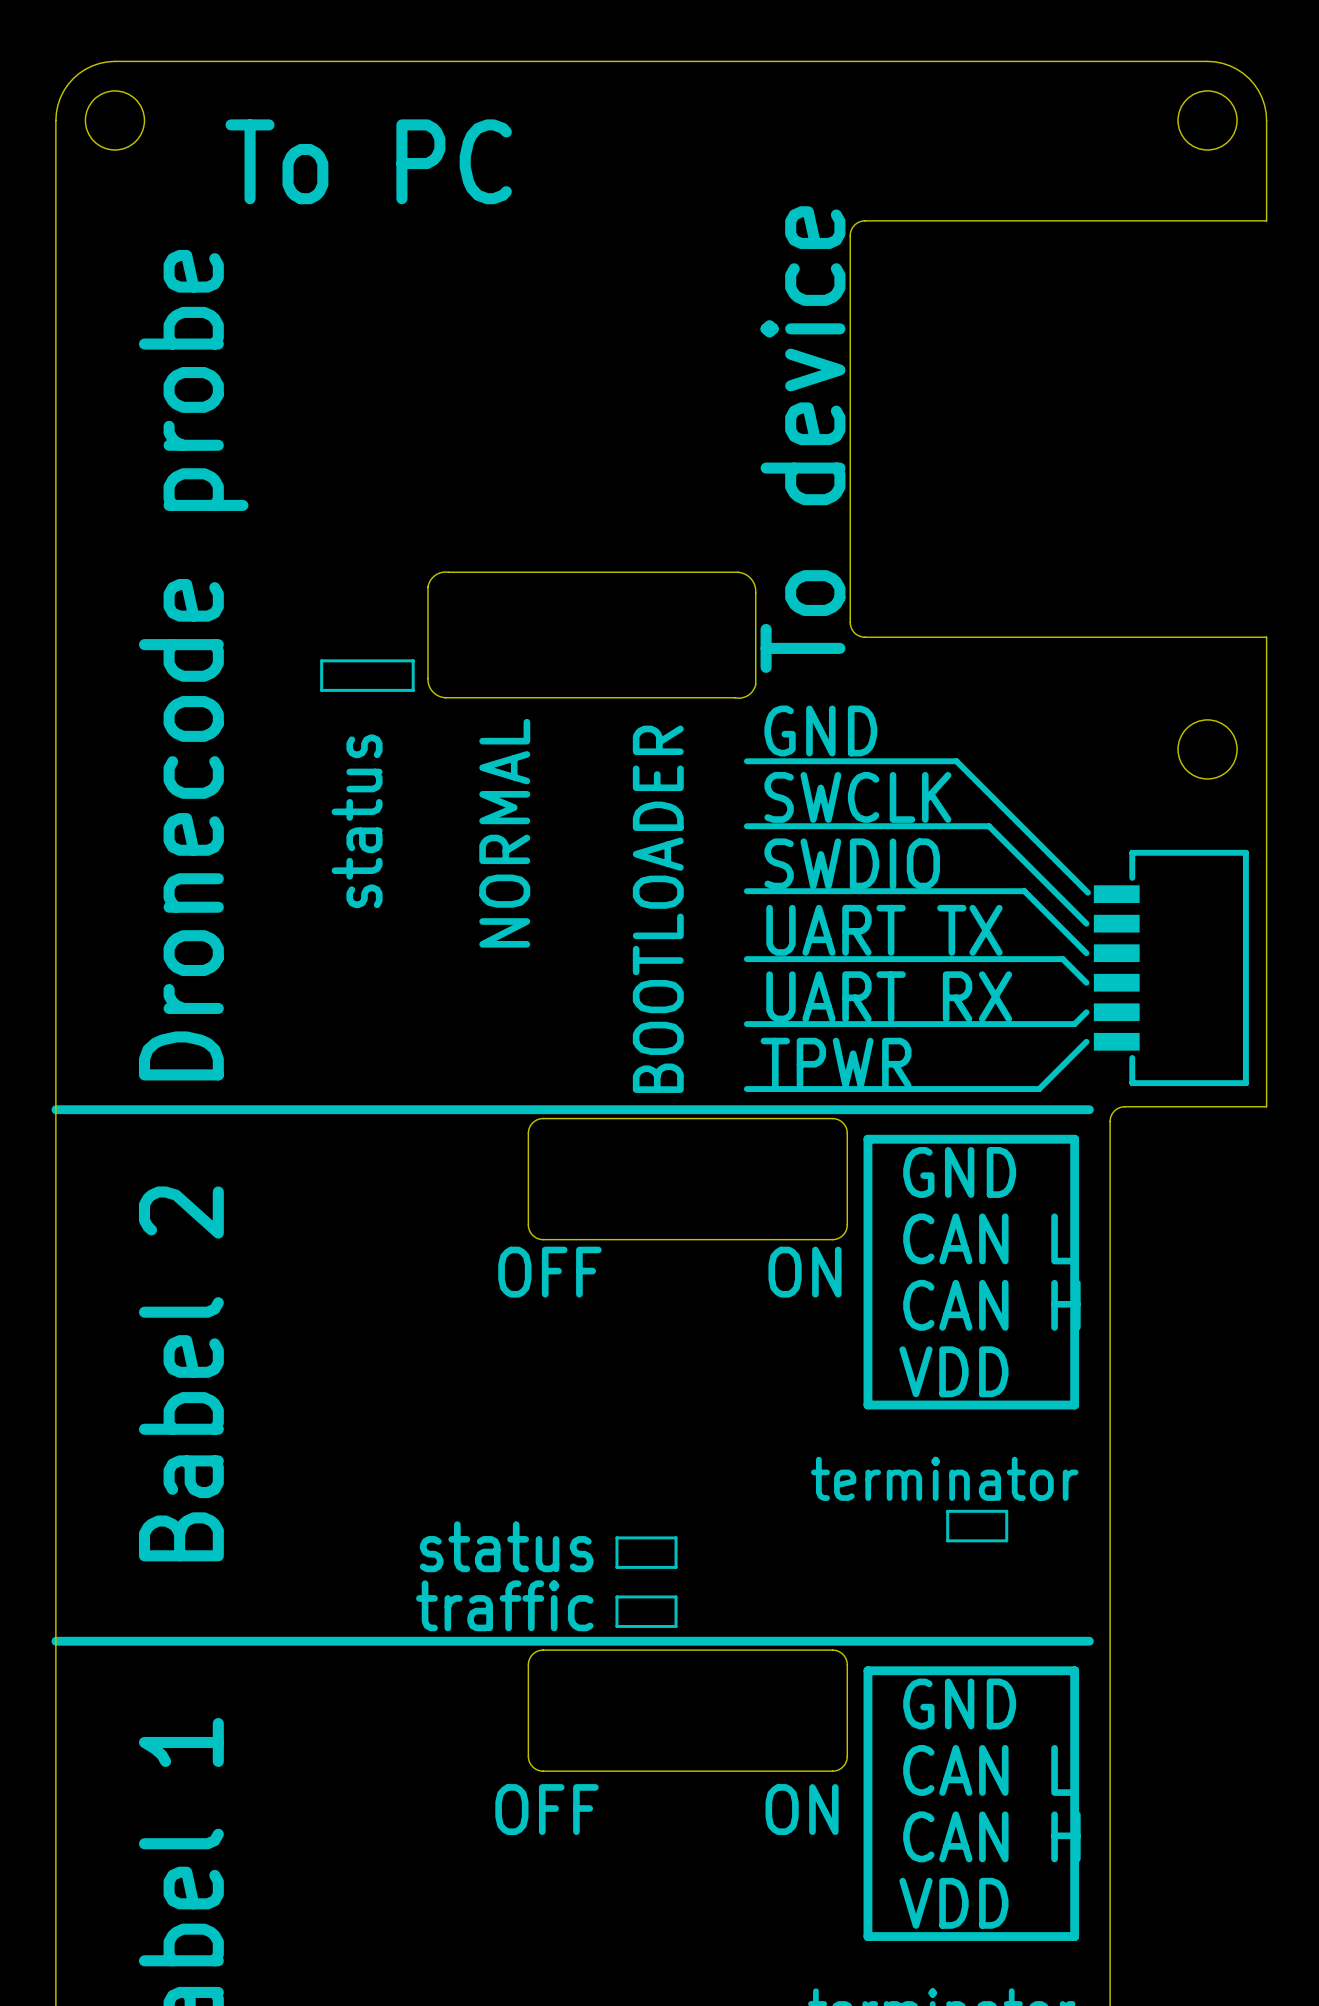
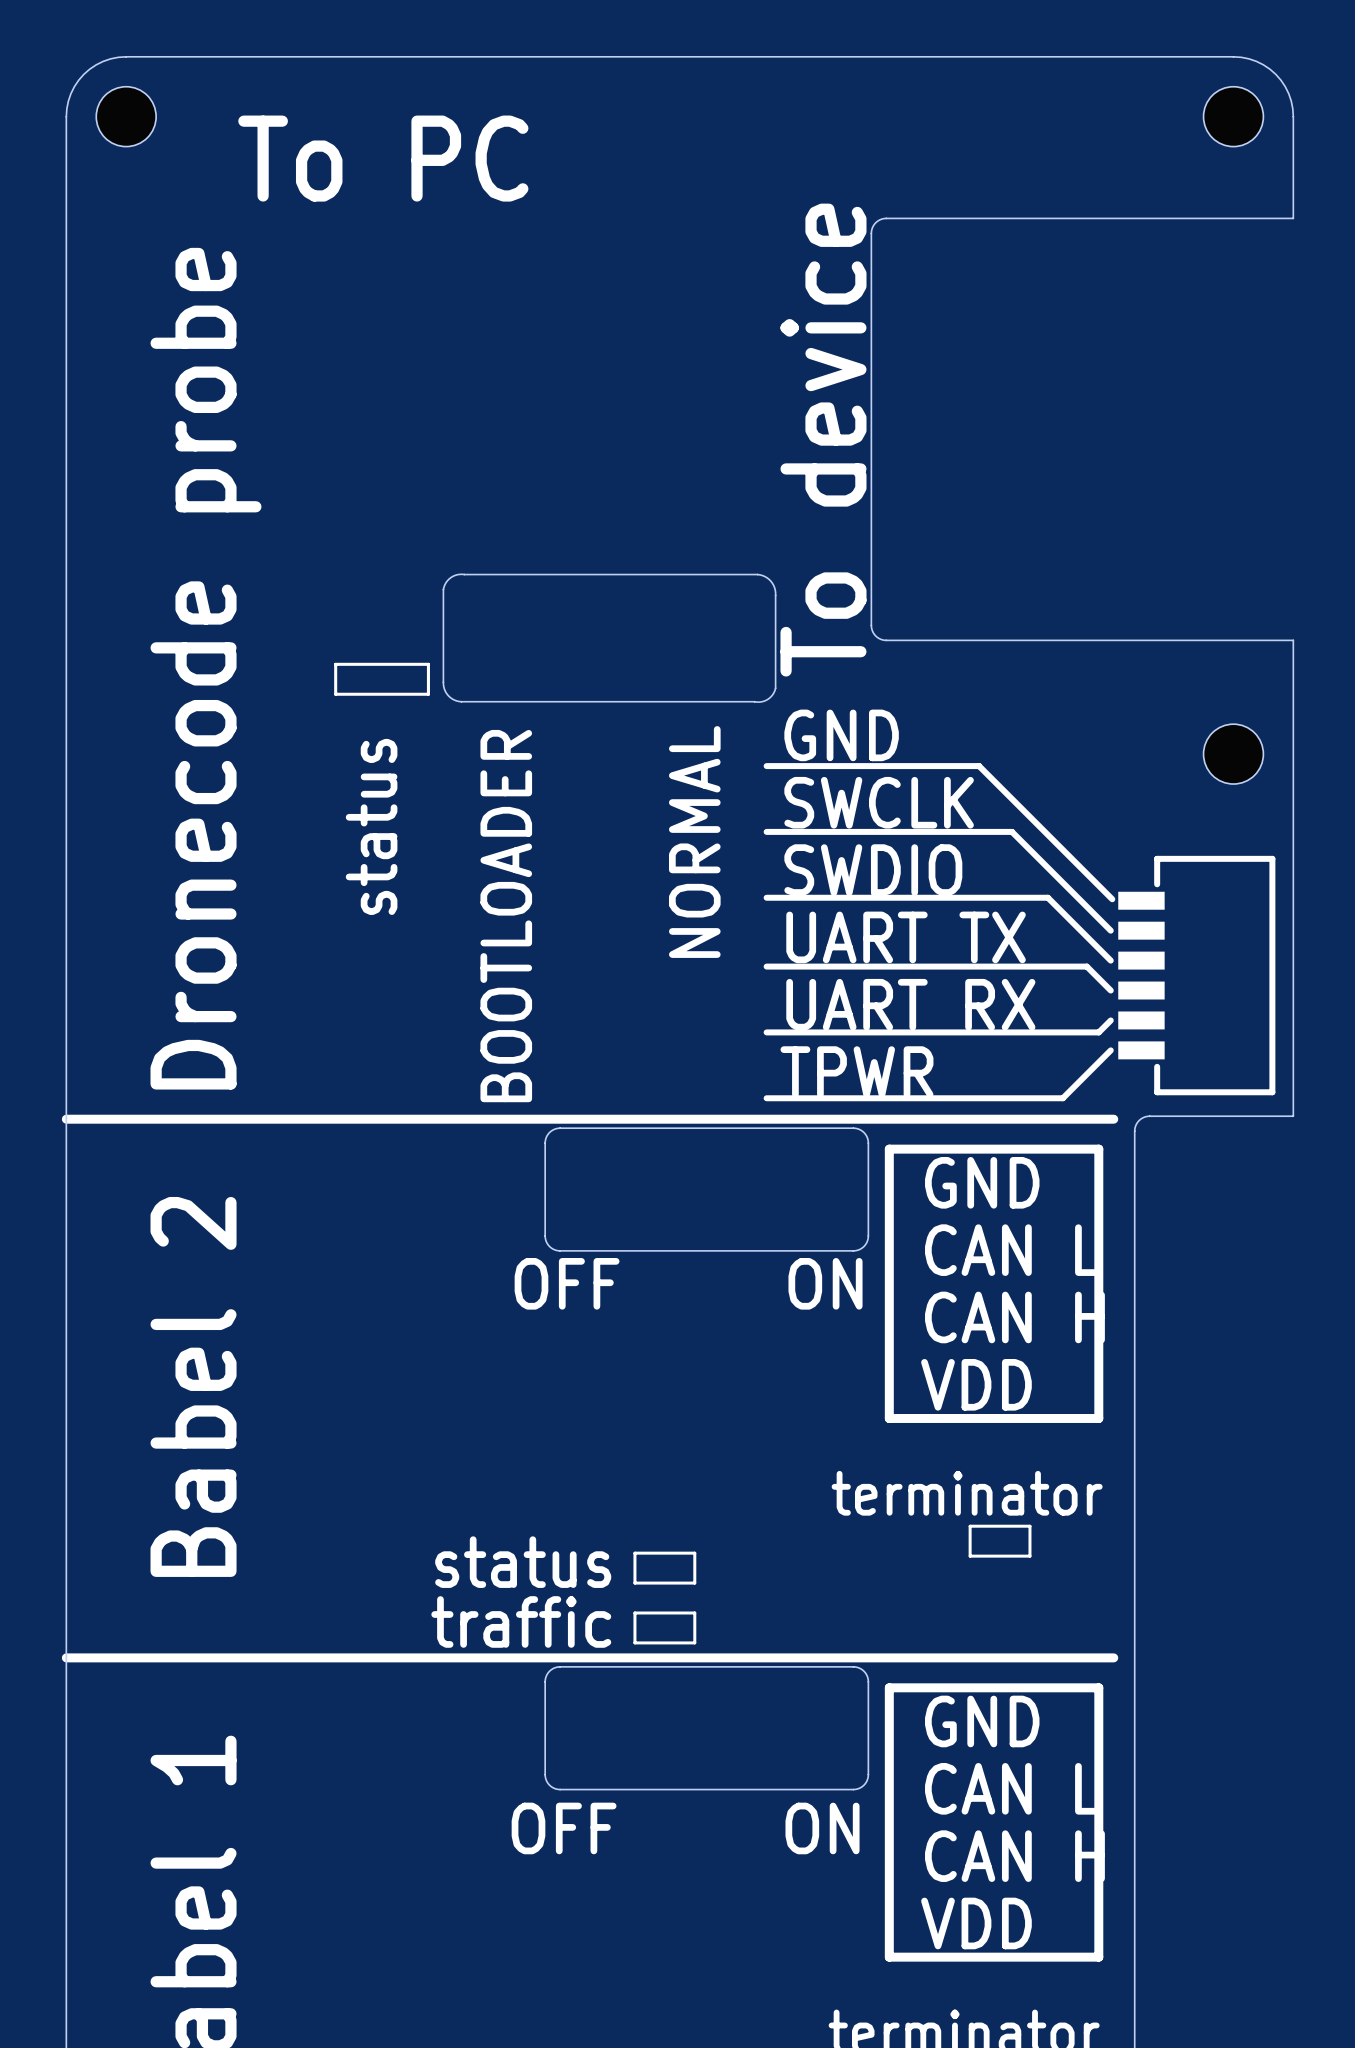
text position: NORMAL (504, 833) -> NORMAL (694, 842)
text position: BOOTLOADER (658, 909) -> BOOTLOADER (506, 916)

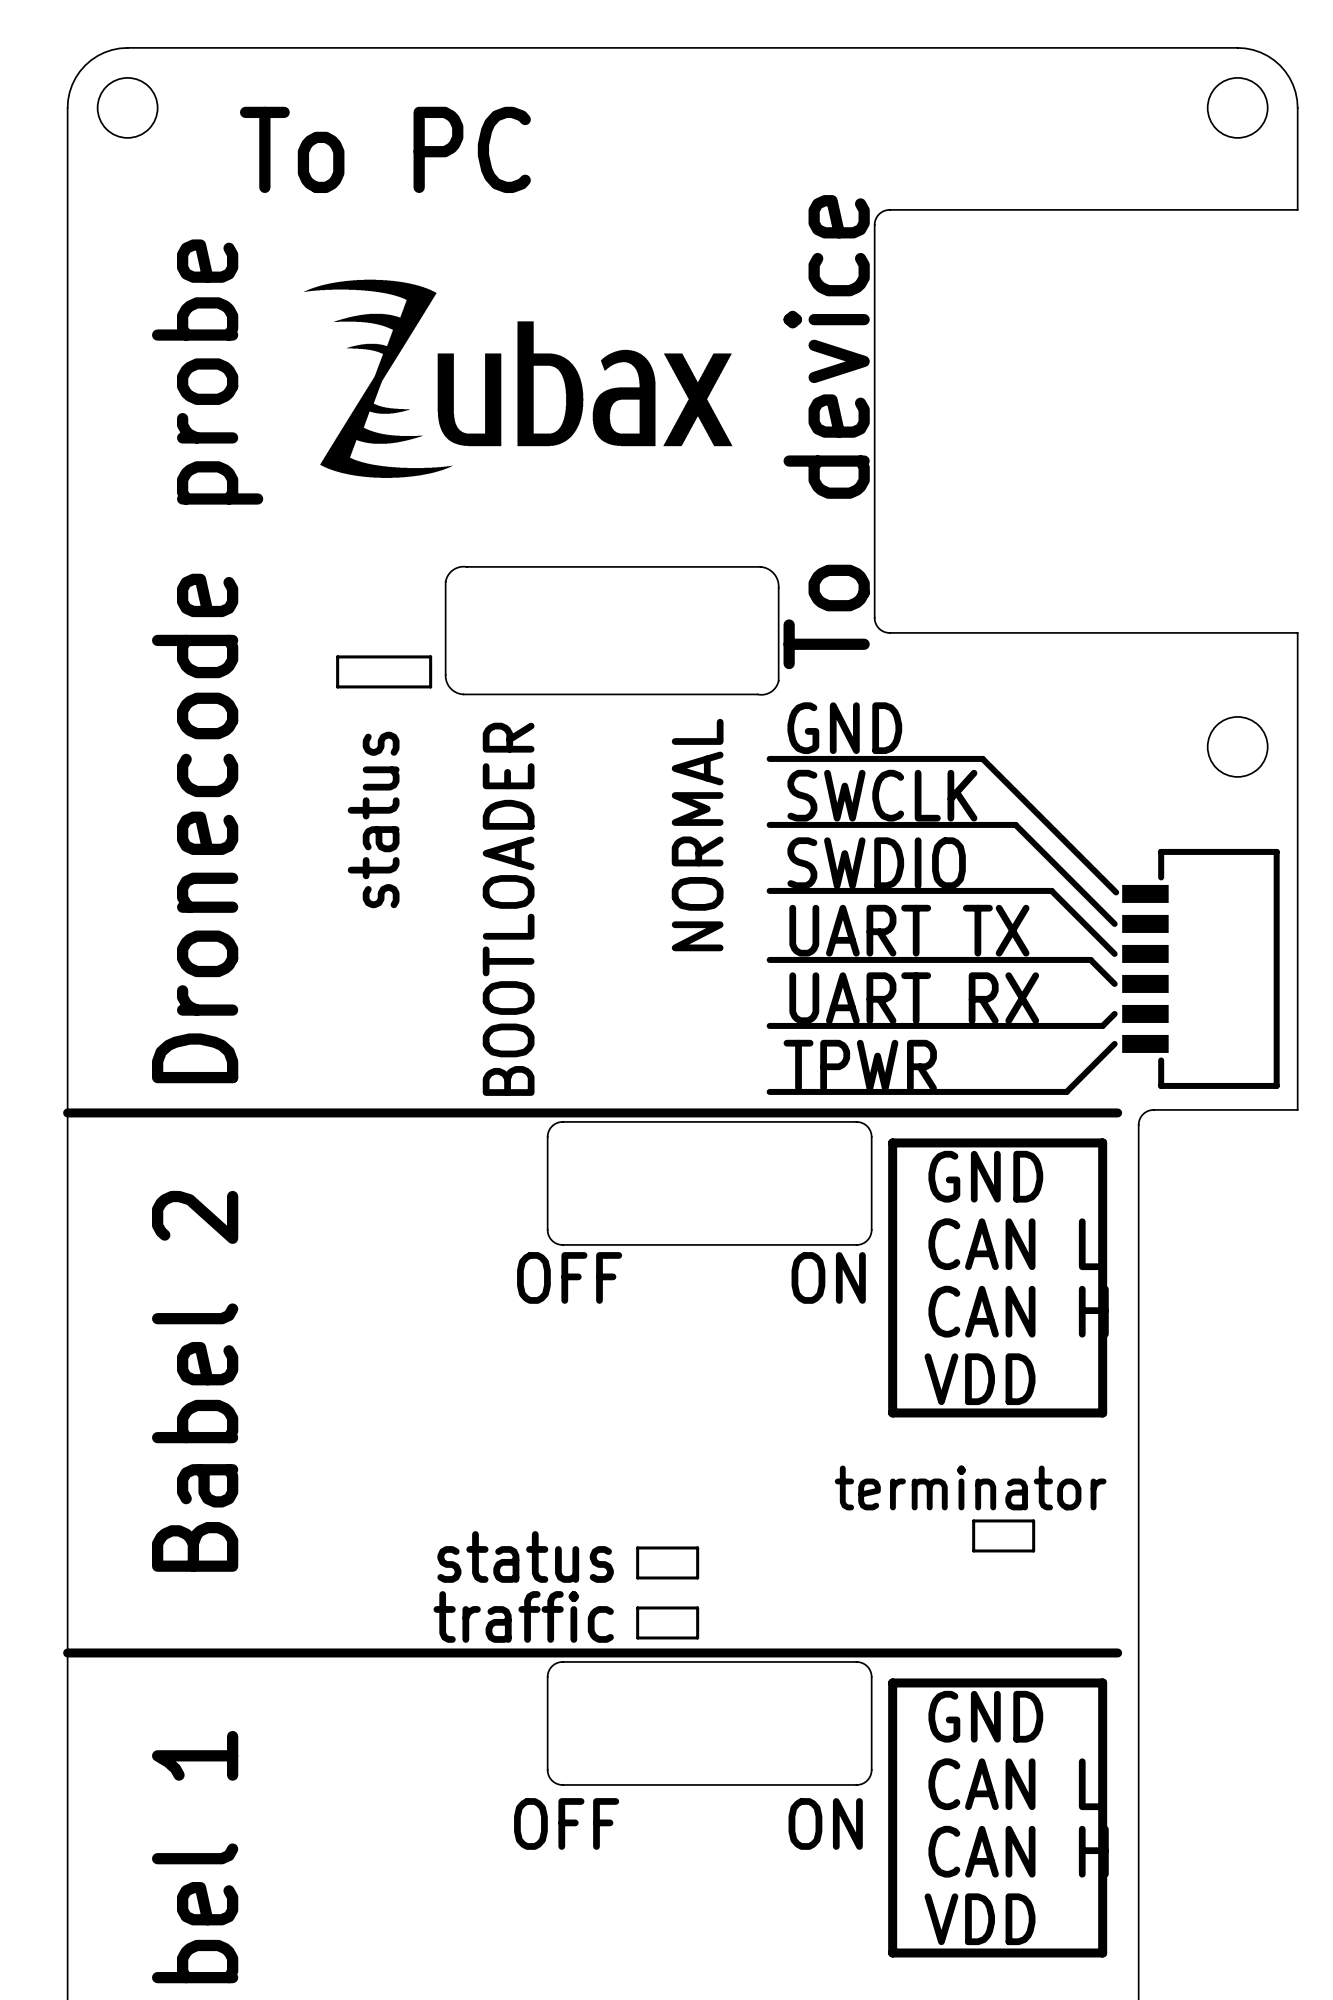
drawing: none -> [303, 279, 733, 478]

